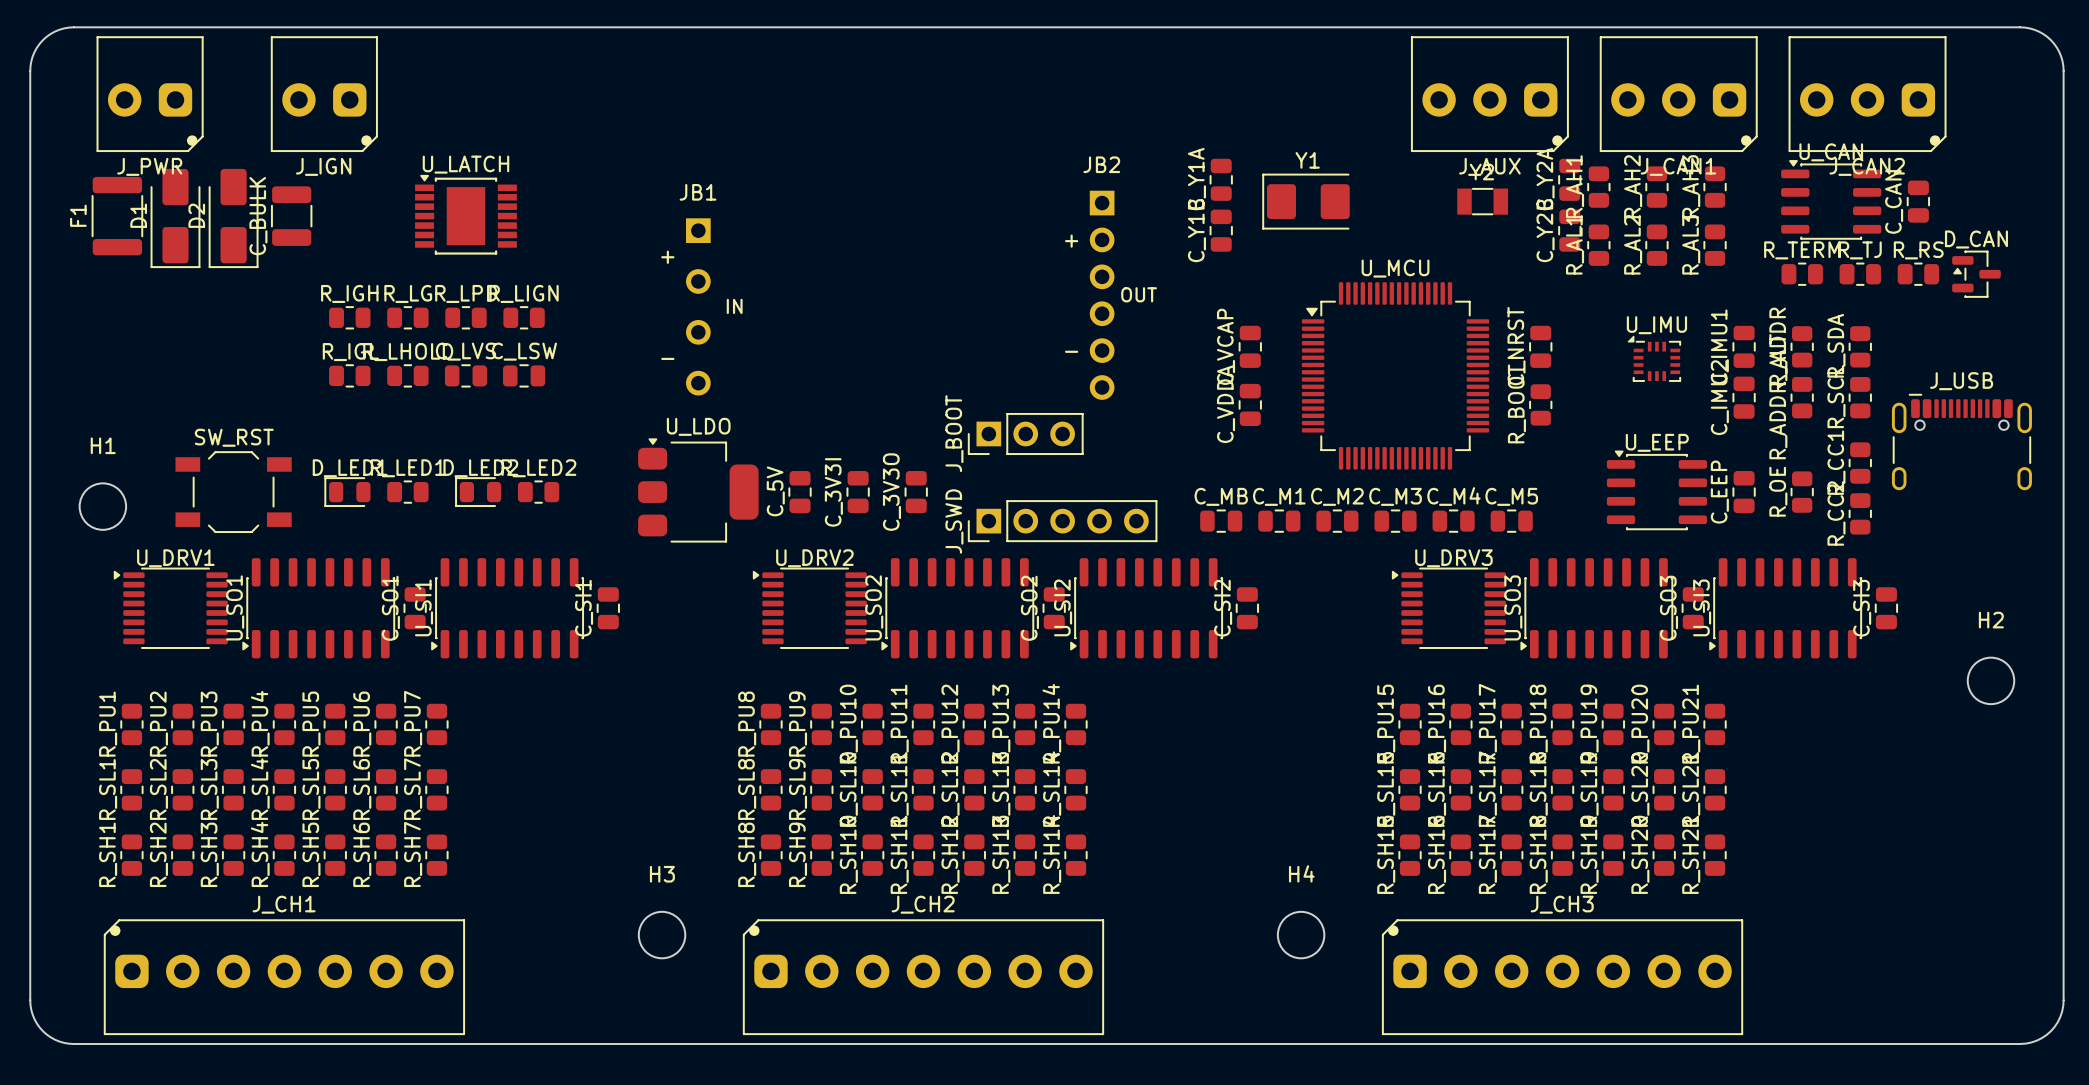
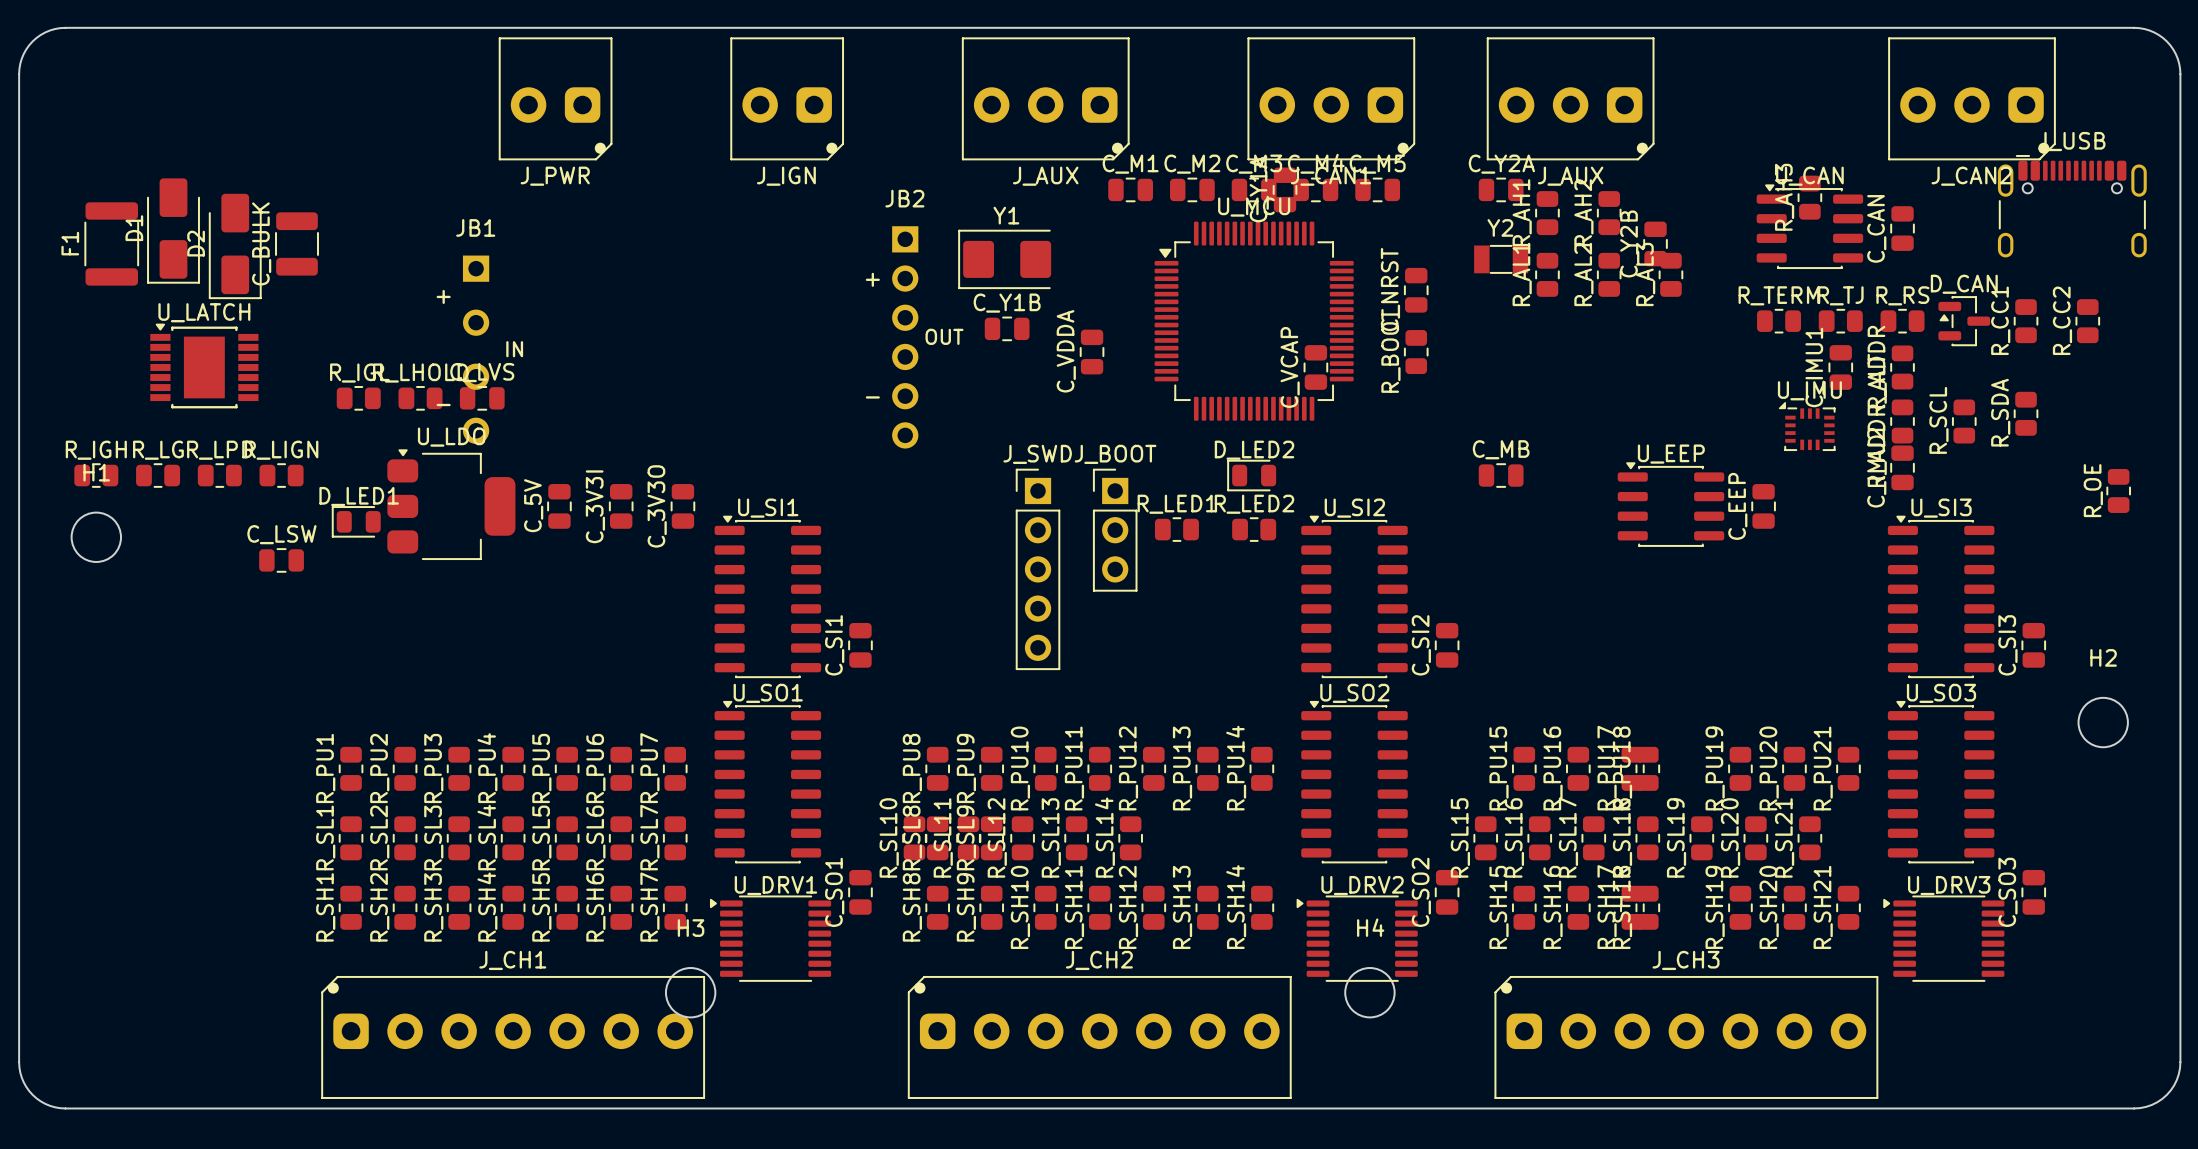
J_PWR: (150, 94) -> none
J_IGN: (324, 94) -> none
J_PWR: none -> (555, 98)
J_IGN: none -> (787, 98)
J_AUX: none -> (1045, 98)
J_CAN1 position: (1678, 94) -> (1331, 98)
C_Y2A rotation: 0° (1569, 179) -> 90° clockwise (1501, 189)
C_Y2A position: (1569, 179) -> (1501, 189)
R_AH1 position: (1598, 187) -> (1547, 213)
R_AH2 position: (1656, 187) -> (1609, 213)
U_CAN position: (1831, 199) -> (1809, 226)
Y1 position: (1306, 201) -> (1004, 259)
Y2 position: (1482, 201) -> (1501, 259)
C_CAN position: (1918, 201) -> (1902, 228)
U_LATCH position: (465, 214) -> (204, 366)
F1 position: (117, 216) -> (111, 243)
C_BULK position: (291, 216) -> (297, 243)
D2 position: (233, 218) -> (235, 246)
C_Y1B rotation: 0° (1221, 230) -> 90° clockwise (1007, 328)
C_Y1B position: (1221, 230) -> (1007, 328)
R_AL1 position: (1598, 245) -> (1547, 274)
R_AL2 position: (1656, 245) -> (1609, 274)
R_AL3 position: (1715, 245) -> (1670, 274)
R_TERM position: (1802, 274) -> (1779, 321)
R_TJ position: (1860, 274) -> (1840, 321)
R_RS position: (1918, 274) -> (1902, 321)
D_CAN position: (1976, 274) -> (1964, 321)
JB2 position: (1102, 295) -> (905, 337)
JB1 position: (698, 306) -> (476, 349)
R_IGH position: (349, 317) -> (96, 475)
R_LG position: (407, 317) -> (158, 475)
R_LPD position: (465, 317) -> (219, 475)
R_LIGN position: (524, 317) -> (281, 475)
C_NRST position: (1540, 346) -> (1416, 290)
R_SDA position: (1860, 346) -> (2026, 413)
U_IMU position: (1654, 358) -> (1807, 426)
C_LSW position: (524, 375) -> (281, 560)
U_MCU position: (1395, 375) -> (1254, 321)
C_IMU2 position: (1744, 397) -> (1902, 467)
C_VDDA position: (1250, 404) -> (1092, 352)
R_BOOT position: (1540, 404) -> (1416, 352)
J_BOOT rotation: 0° (1025, 433) -> 90° clockwise (1115, 530)
J_BOOT position: (1025, 433) -> (1115, 530)
J_USB position: (1961, 442) -> (2072, 206)
R_CC1 position: (1860, 463) -> (2026, 321)
U_LDO position: (698, 490) -> (451, 504)
U_EEP position: (1656, 490) -> (1670, 504)
SW_RST: (233, 492) -> none
R_LED1 position: (407, 492) -> (1176, 529)
D_LED2 position: (478, 492) -> (1251, 475)
R_LED2 position: (538, 492) -> (1254, 529)
C_5V position: (800, 492) -> (559, 506)
C_3V3I position: (858, 492) -> (621, 506)
C_3V3O position: (916, 492) -> (682, 506)
C_EEP position: (1744, 492) -> (1763, 506)
R_OE position: (1802, 492) -> (2118, 490)
R_CC2 position: (1860, 513) -> (2087, 321)
J_SWD rotation: 0° (1062, 521) -> 90° clockwise (1038, 569)
C_MB position: (1221, 521) -> (1501, 475)
C_M1 position: (1279, 521) -> (1130, 189)
C_M2 position: (1337, 521) -> (1192, 189)
C_M3 position: (1395, 521) -> (1254, 189)
C_M4 position: (1453, 521) -> (1315, 189)
C_M5 position: (1511, 521) -> (1377, 189)
U_DRV1 position: (170, 608) -> (770, 938)
U_SO1 rotation: 0° (318, 608) -> 90° clockwise (767, 782)
U_SO1 position: (318, 608) -> (767, 782)
C_SO1 position: (415, 608) -> (860, 892)
U_SI1 rotation: 0° (507, 608) -> 90° clockwise (767, 596)
U_SI1 position: (507, 608) -> (767, 596)
C_SI1 position: (608, 608) -> (860, 645)
U_DRV2 position: (809, 608) -> (1357, 938)
U_SO2 rotation: 0° (957, 608) -> 90° clockwise (1354, 782)
U_SO2 position: (957, 608) -> (1354, 782)
C_SO2 position: (1054, 608) -> (1447, 892)
U_SI2 rotation: 0° (1146, 608) -> 90° clockwise (1354, 596)
U_SI2 position: (1146, 608) -> (1354, 596)
C_SI2 position: (1247, 608) -> (1447, 645)
U_DRV3 position: (1448, 608) -> (1943, 938)
U_SO3 rotation: 0° (1596, 608) -> 90° clockwise (1941, 782)
U_SO3 position: (1596, 608) -> (1941, 782)
C_SO3 position: (1693, 608) -> (2033, 892)
U_SI3 rotation: 0° (1785, 608) -> 90° clockwise (1941, 596)
C_SI3 position: (1886, 608) -> (2033, 645)
R_PU1 position: (131, 724) -> (351, 768)
R_PU2 position: (182, 724) -> (405, 768)
R_PU3 position: (233, 724) -> (459, 768)
R_PU4 position: (284, 724) -> (513, 768)
R_PU5 position: (335, 724) -> (567, 768)
R_PU6 position: (386, 724) -> (621, 768)
R_PU7 position: (436, 724) -> (675, 768)
R_PU8 position: (770, 724) -> (937, 768)
R_PU9 position: (821, 724) -> (991, 768)
R_PU10 position: (872, 724) -> (1045, 768)
R_PU11 position: (923, 724) -> (1099, 768)
R_PU12 position: (974, 724) -> (1153, 768)
R_PU13 position: (1025, 724) -> (1207, 768)
R_PU14 position: (1075, 724) -> (1261, 768)
R_PU15 position: (1410, 724) -> (1524, 768)
R_PU16 position: (1460, 724) -> (1578, 768)
R_PU17 position: (1511, 724) -> (1632, 768)
R_PU19 position: (1613, 724) -> (1740, 768)
R_PU20 position: (1664, 724) -> (1794, 768)
R_PU21 position: (1715, 724) -> (1848, 768)
R_SL1 position: (131, 789) -> (351, 838)
R_SL2 position: (182, 789) -> (405, 838)
R_SL3 position: (233, 789) -> (459, 838)
R_SL4 position: (284, 789) -> (513, 838)
R_SL5 position: (335, 789) -> (567, 838)
R_SL6 position: (386, 789) -> (621, 838)
R_SL7 position: (436, 789) -> (675, 838)
R_SL8 position: (770, 789) -> (937, 838)
R_SL9 position: (821, 789) -> (991, 838)
R_SH1 position: (131, 855) -> (351, 907)
R_SH2 position: (182, 855) -> (405, 907)
R_SH3 position: (233, 855) -> (459, 907)
R_SH4 position: (284, 855) -> (513, 907)
R_SH5 position: (335, 855) -> (567, 907)
R_SH6 position: (386, 855) -> (621, 907)
R_SH7 position: (436, 855) -> (675, 907)
R_SH8 position: (770, 855) -> (937, 907)
R_SH9 position: (821, 855) -> (991, 907)
R_SH10 position: (872, 855) -> (1045, 907)
R_SH11 position: (923, 855) -> (1099, 907)
R_SH12 position: (974, 855) -> (1153, 907)
R_SH13 position: (1025, 855) -> (1207, 907)
R_SH14 position: (1075, 855) -> (1261, 907)
R_SH15 position: (1410, 855) -> (1524, 907)
R_SH16 position: (1460, 855) -> (1578, 907)
R_SH17 position: (1511, 855) -> (1632, 907)
R_SH19 position: (1613, 855) -> (1740, 907)
R_SH20 position: (1664, 855) -> (1794, 907)
R_SH21 position: (1715, 855) -> (1848, 907)
J_CH1 position: (284, 977) -> (513, 1037)
J_CH2 position: (923, 977) -> (1099, 1037)
J_CH3 position: (1562, 977) -> (1686, 1037)

